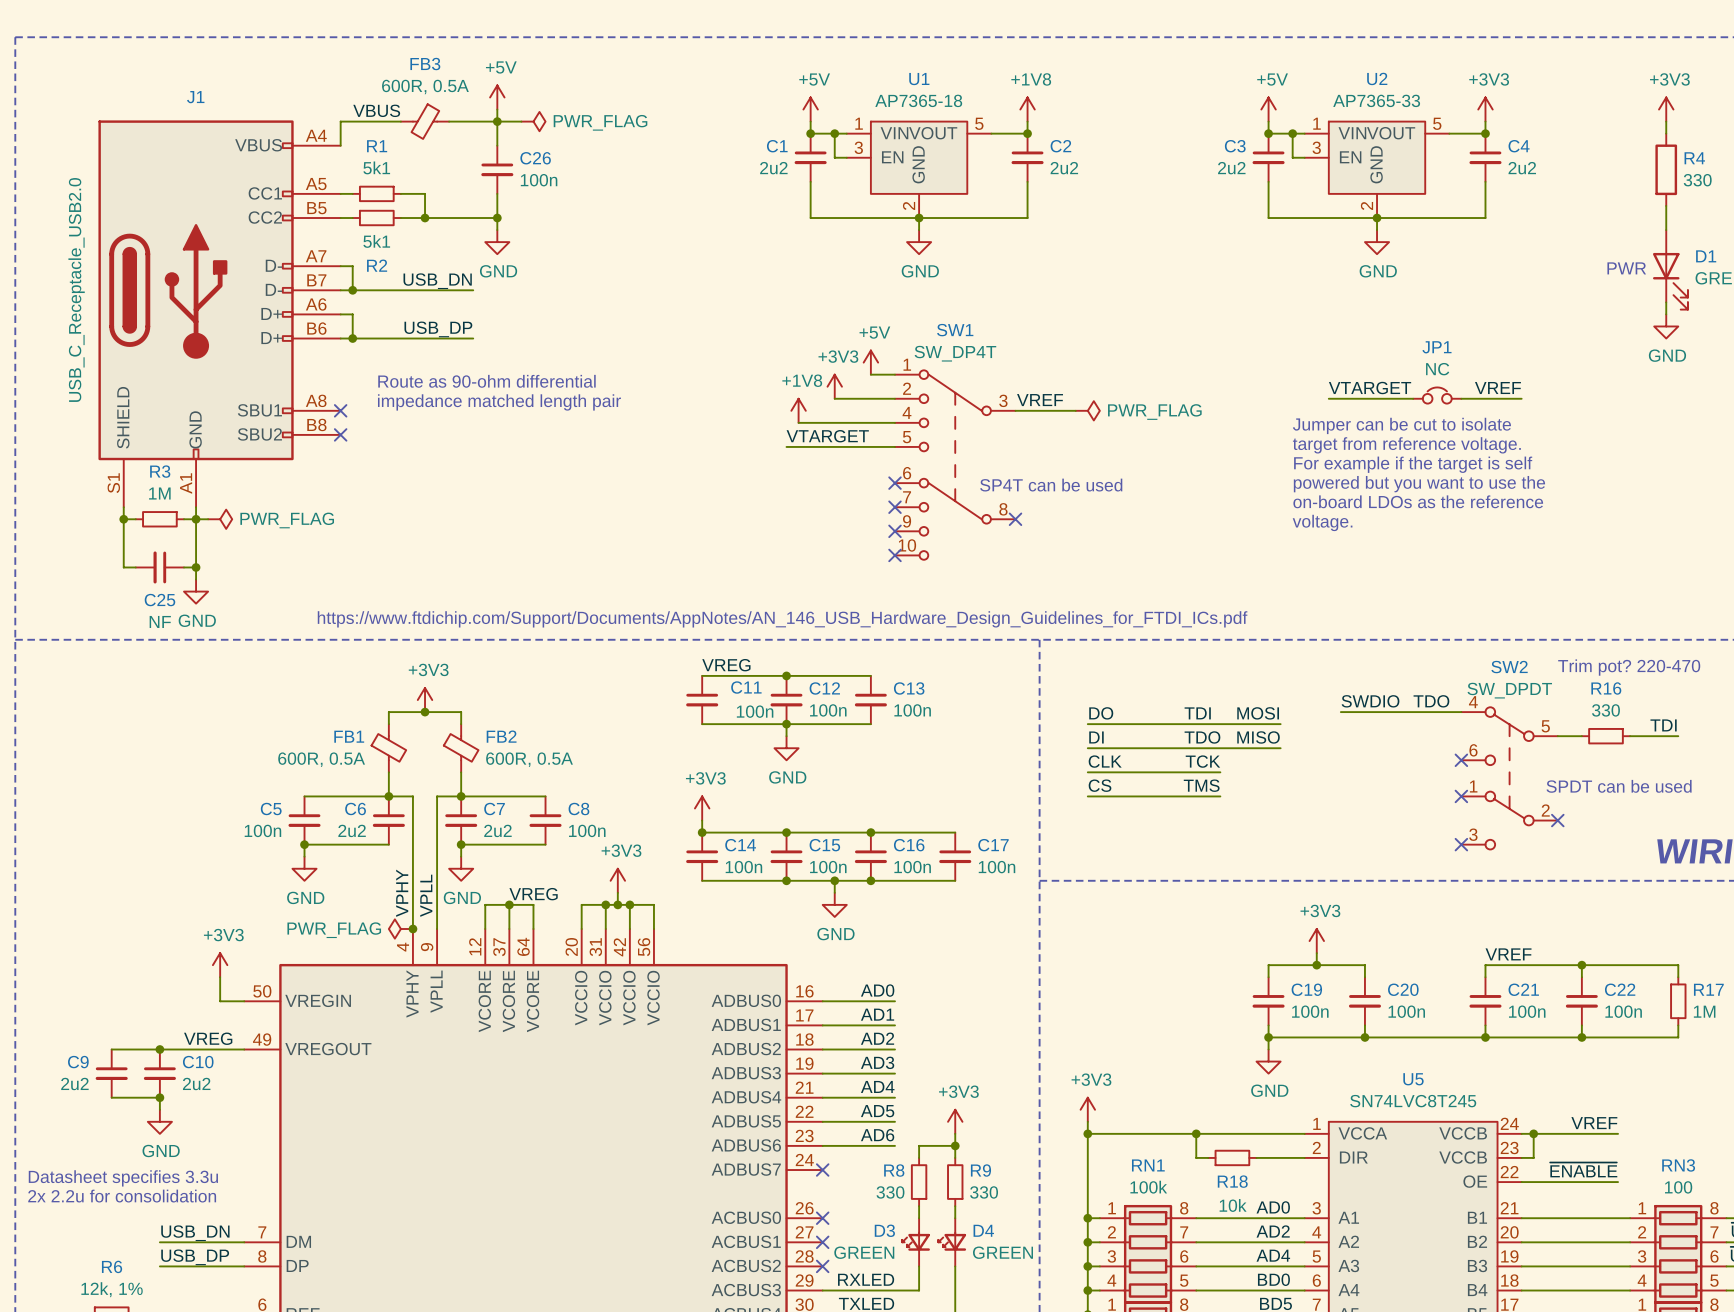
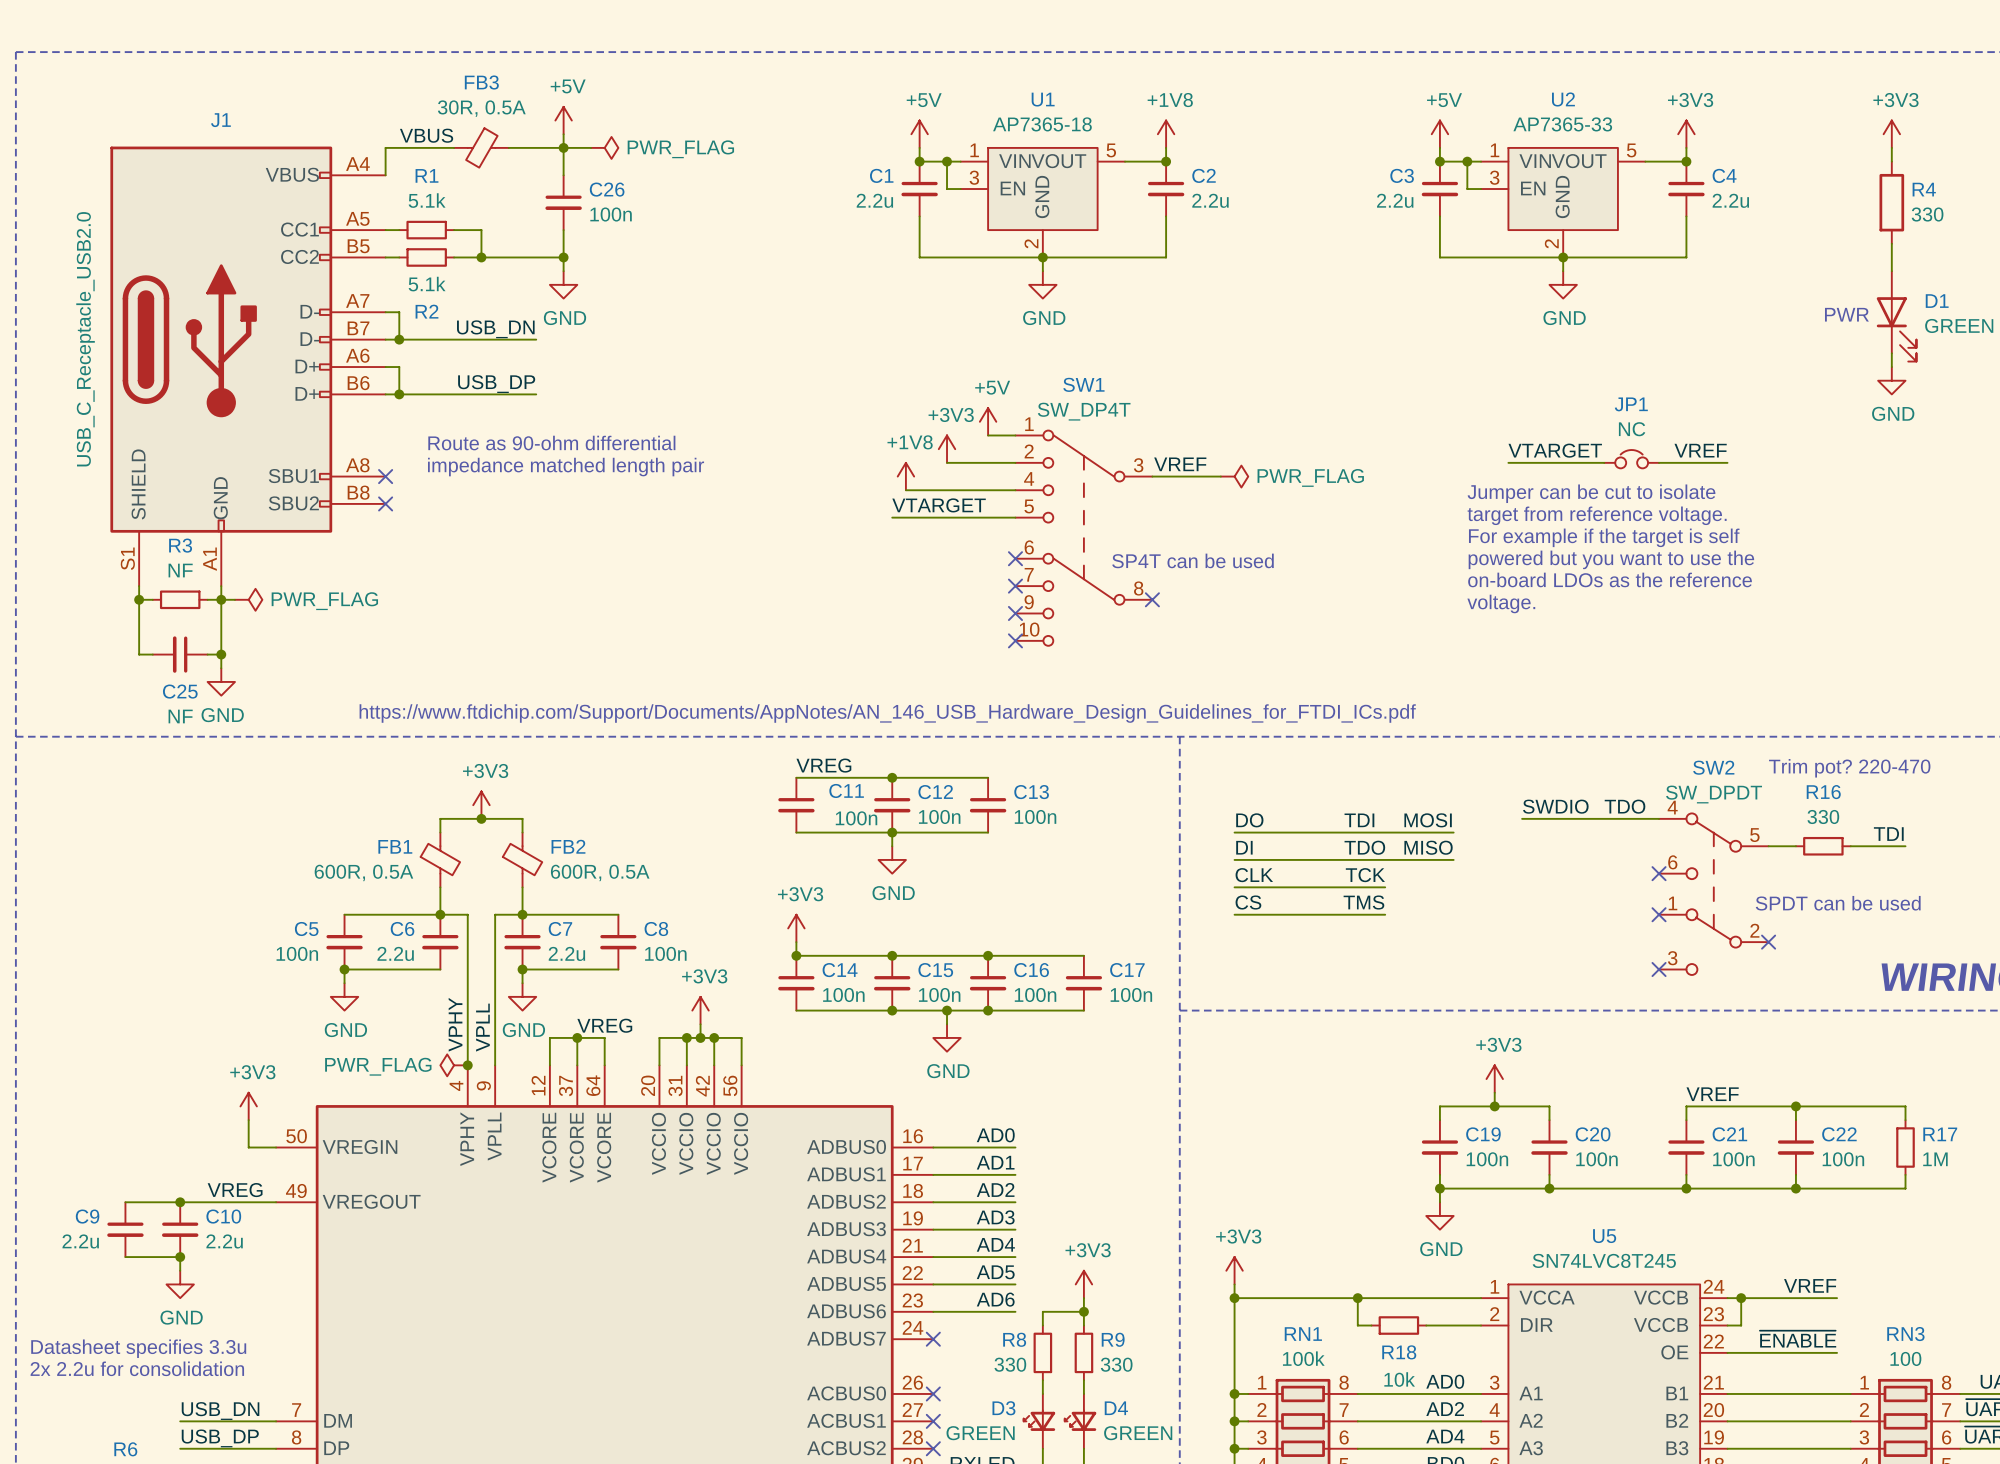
FB3 value: 600R, 0.5A (425, 86) -> 30R, 0.5A (481, 108)
R1 value: 5k1 (376, 167) -> 5.1k (427, 200)
C1 value: 2u2 (773, 168) -> 2.2u (874, 200)
C2 value: 2u2 (1064, 168) -> 2.2u (1210, 200)
C3 value: 2u2 (1231, 168) -> 2.2u (1395, 200)
C4 value: 2u2 (1522, 168) -> 2.2u (1730, 200)
R2 value: 5k1 (376, 241) -> 5.1k (427, 284)
R3 value: 1M (159, 493) -> NF (180, 570)
C6 value: 2u2 (352, 830) -> 2.2u (395, 953)
C7 value: 2u2 (497, 830) -> 2.2u (566, 953)
C9 value: 2u2 (74, 1084) -> 2.2u (80, 1241)
C10 value: 2u2 (196, 1084) -> 2.2u (224, 1241)

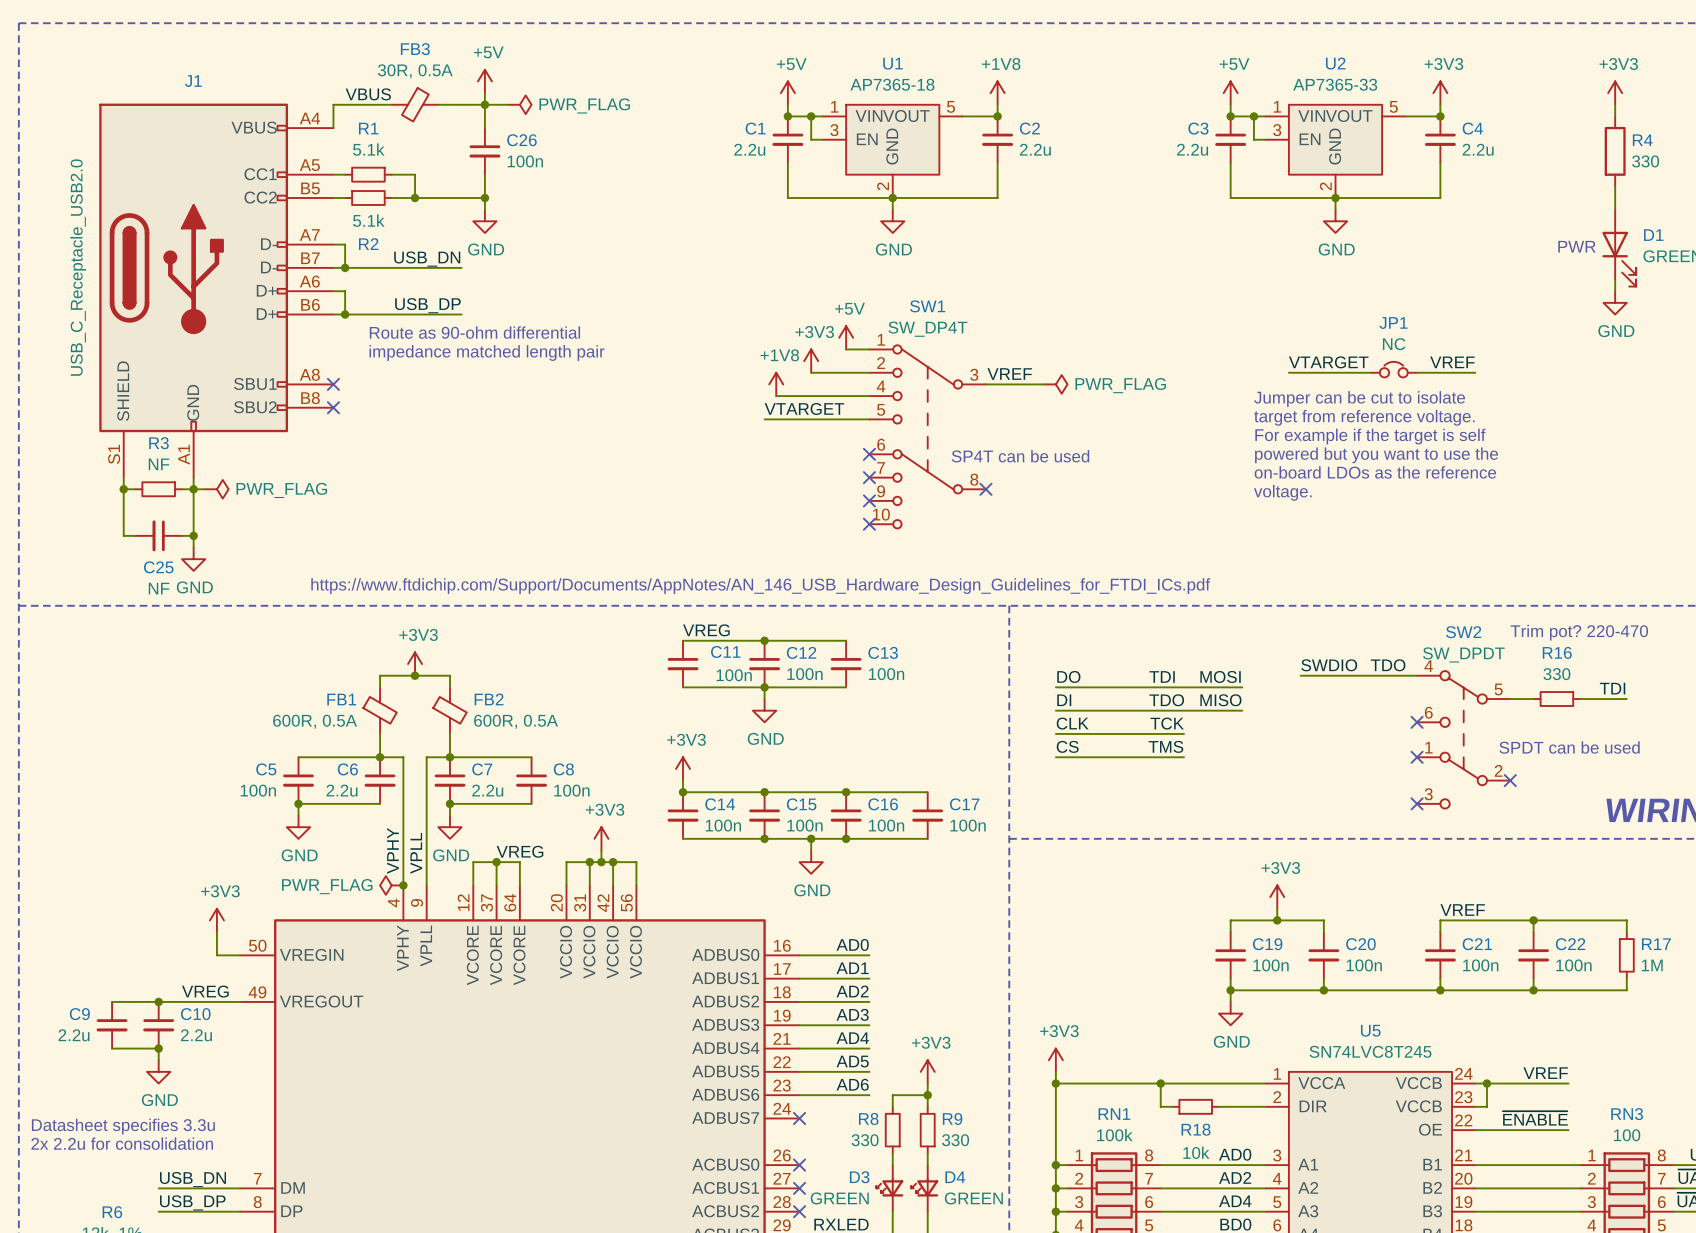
text: none -> Route as 90-ohm differential (474, 332)
text: Route as 90-ohm differential (551, 443) -> impedance matched length pair (487, 353)
text: impedance matched length pair (566, 467) -> none

